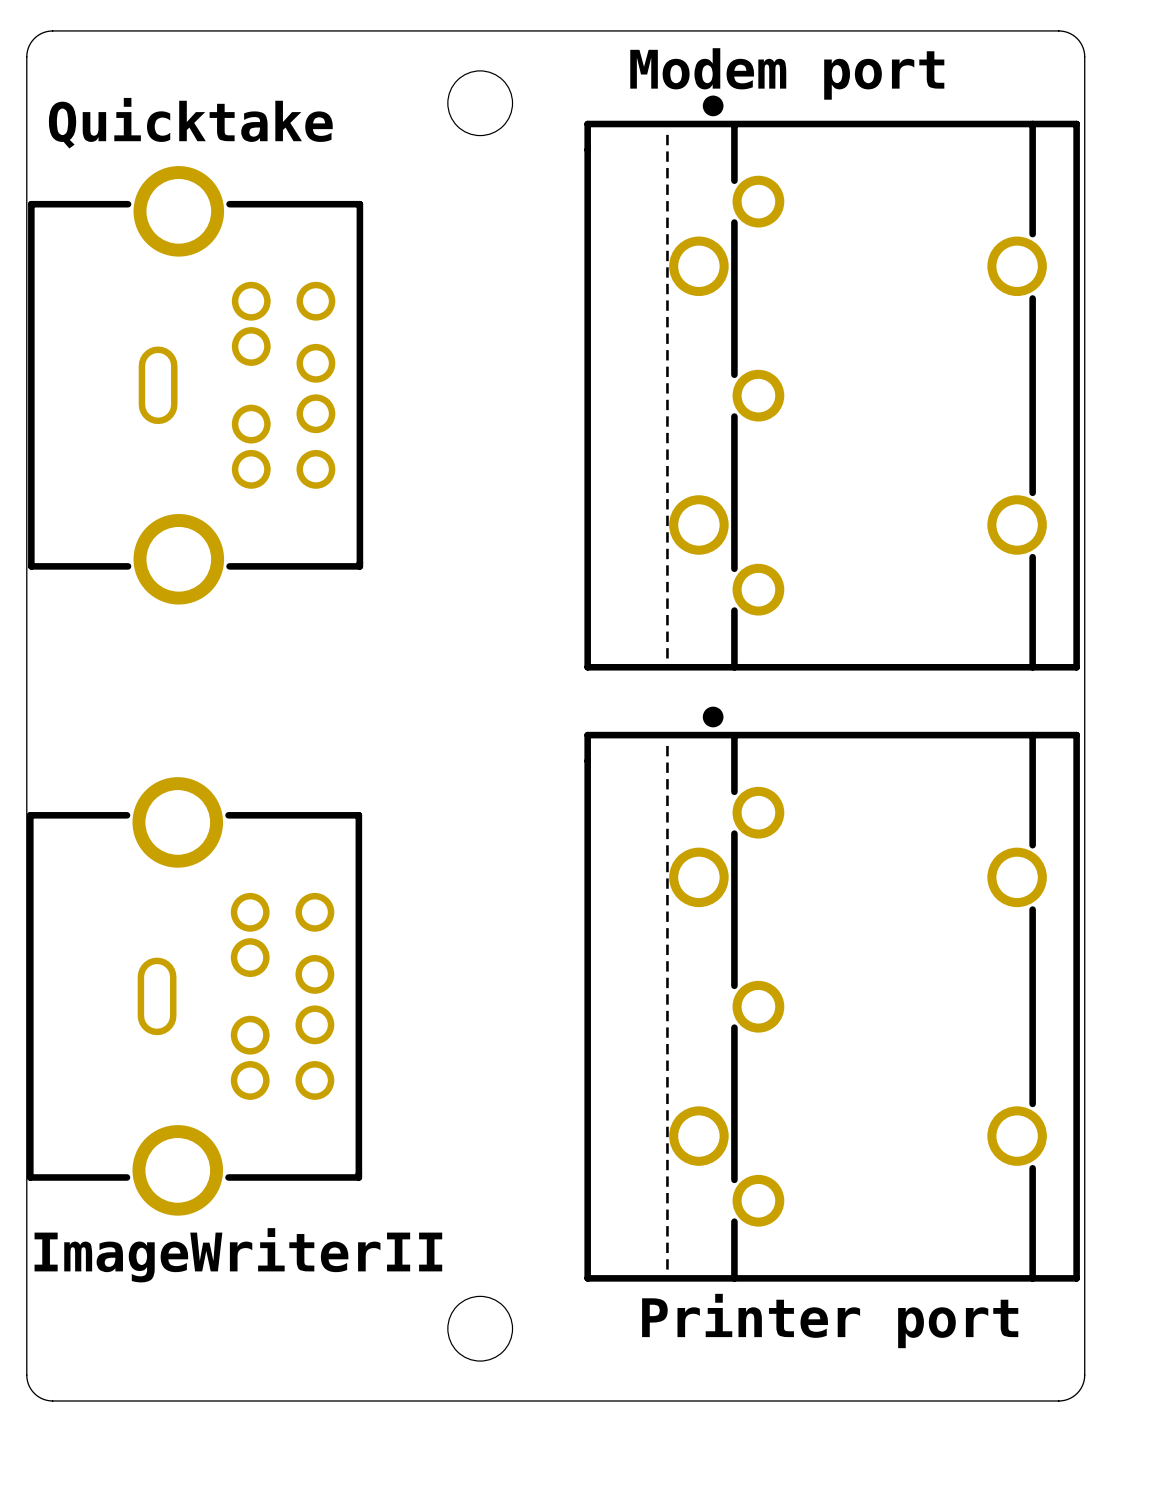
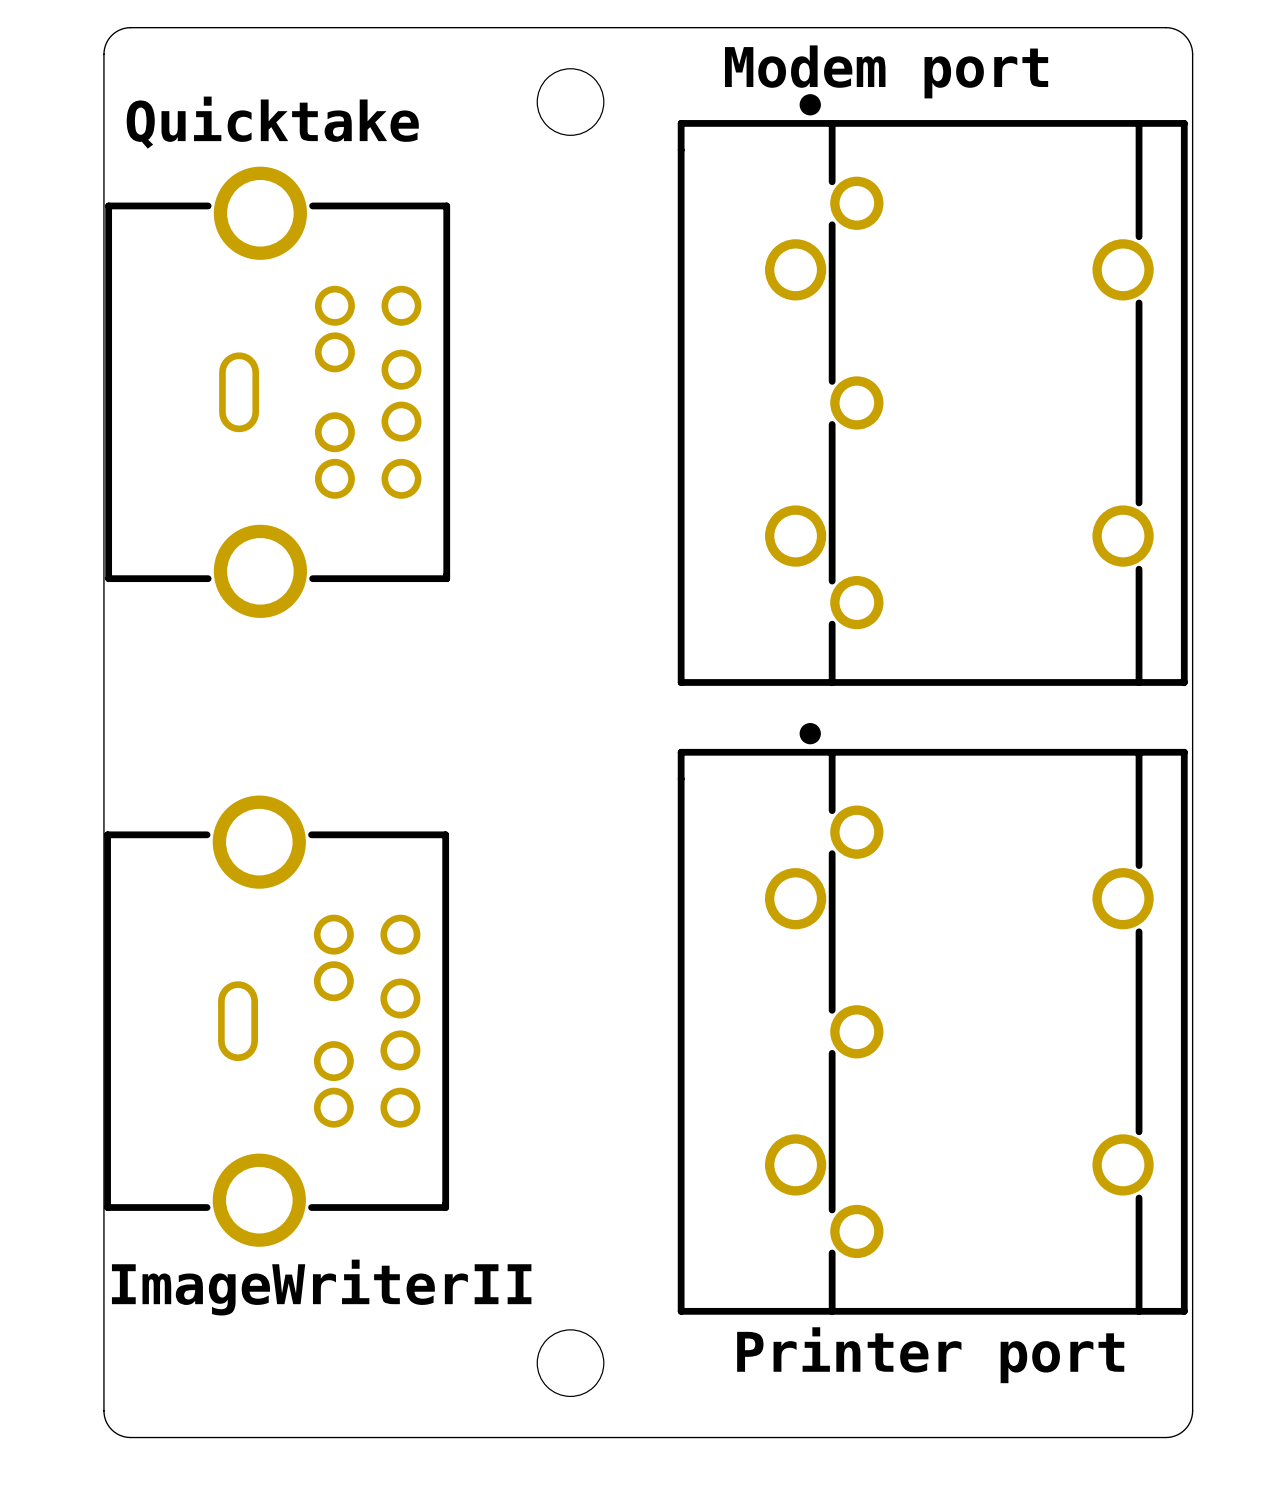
part footprint: [584, 95, 1080, 671] -> [677, 94, 1188, 686]
part footprint: [584, 706, 1080, 1282] -> [677, 723, 1188, 1315]

